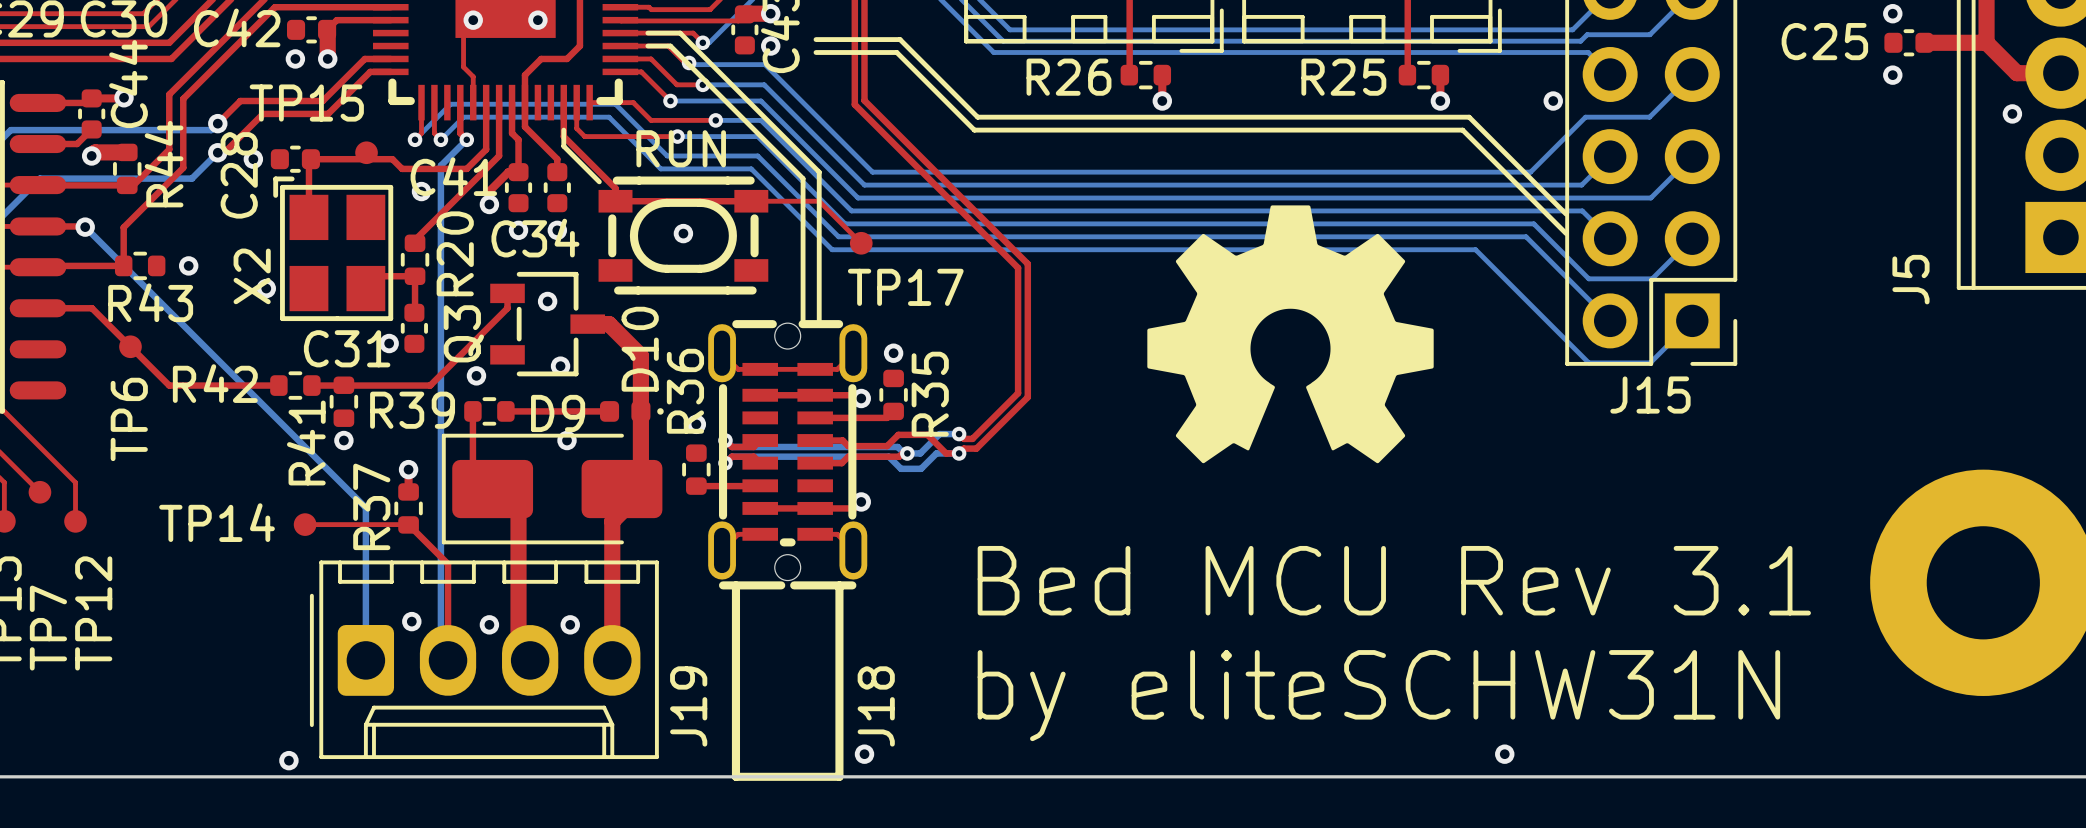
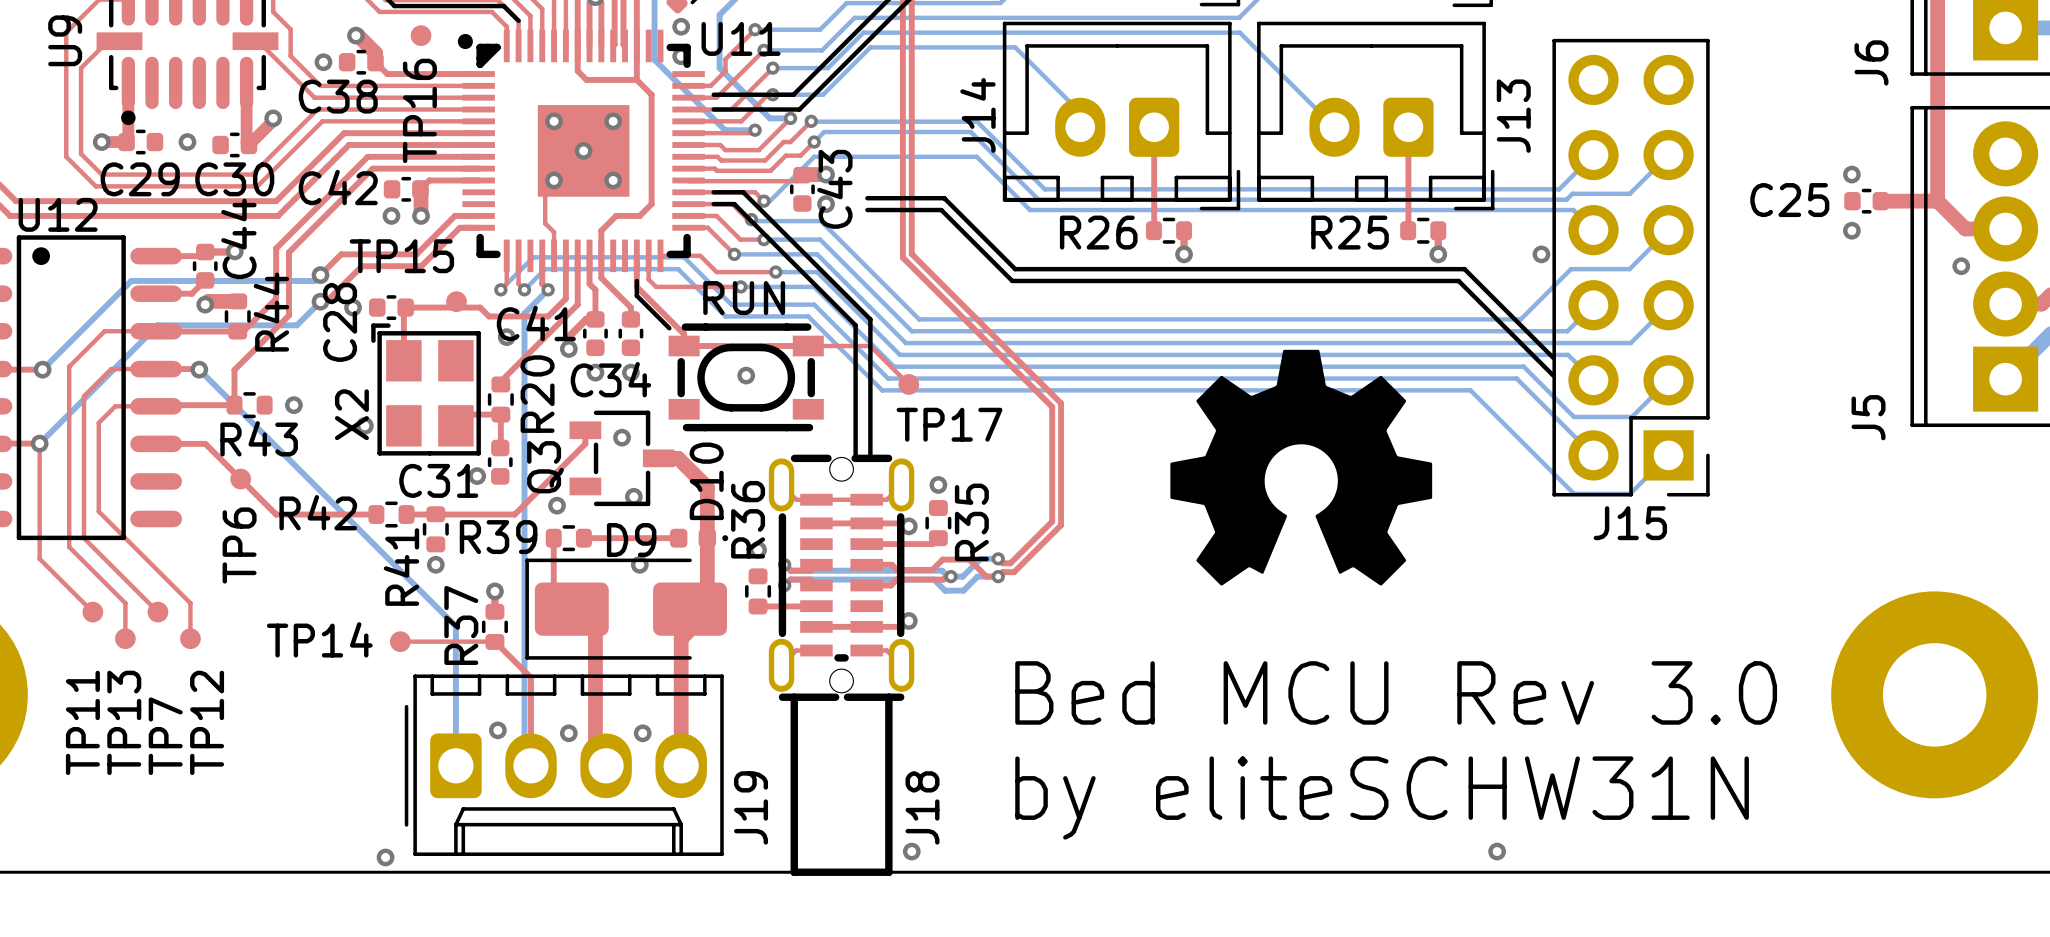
text: Bed MCU Rev 3.1 (1394, 580) -> Bed MCU Rev 3.0 (1396, 692)

